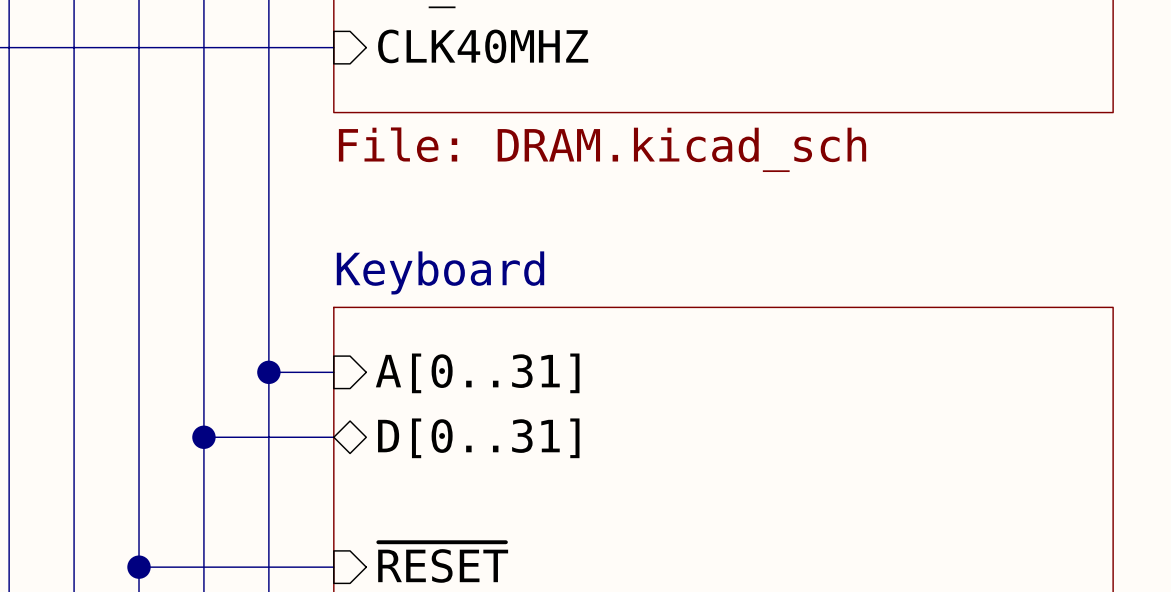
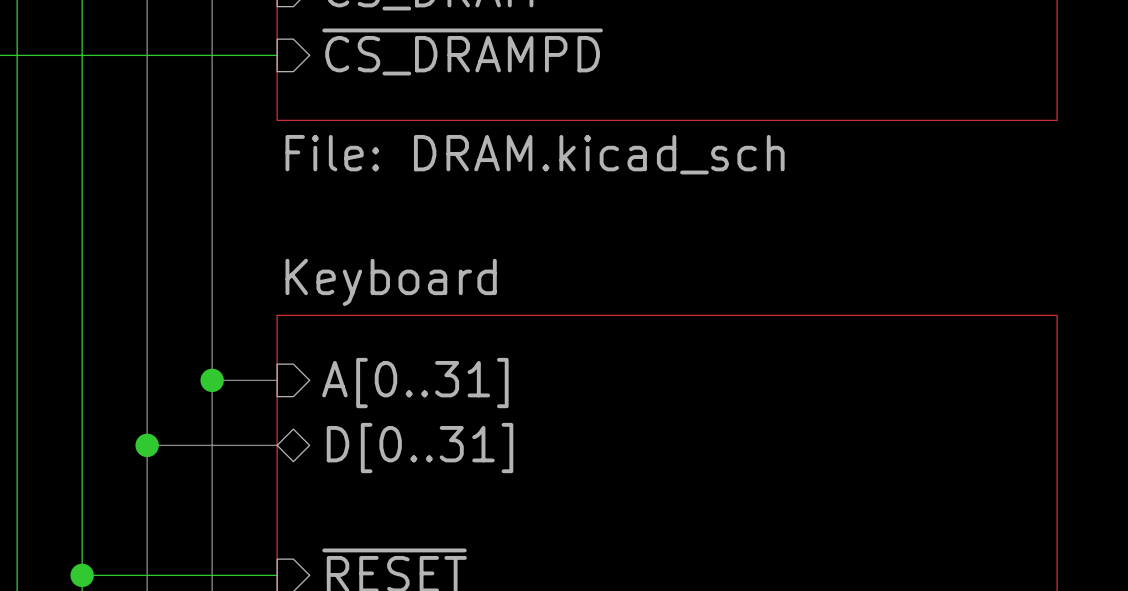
sheet pin: CLK40MHZ (483, 46) -> ~{CS_DRAMPD} (462, 51)

